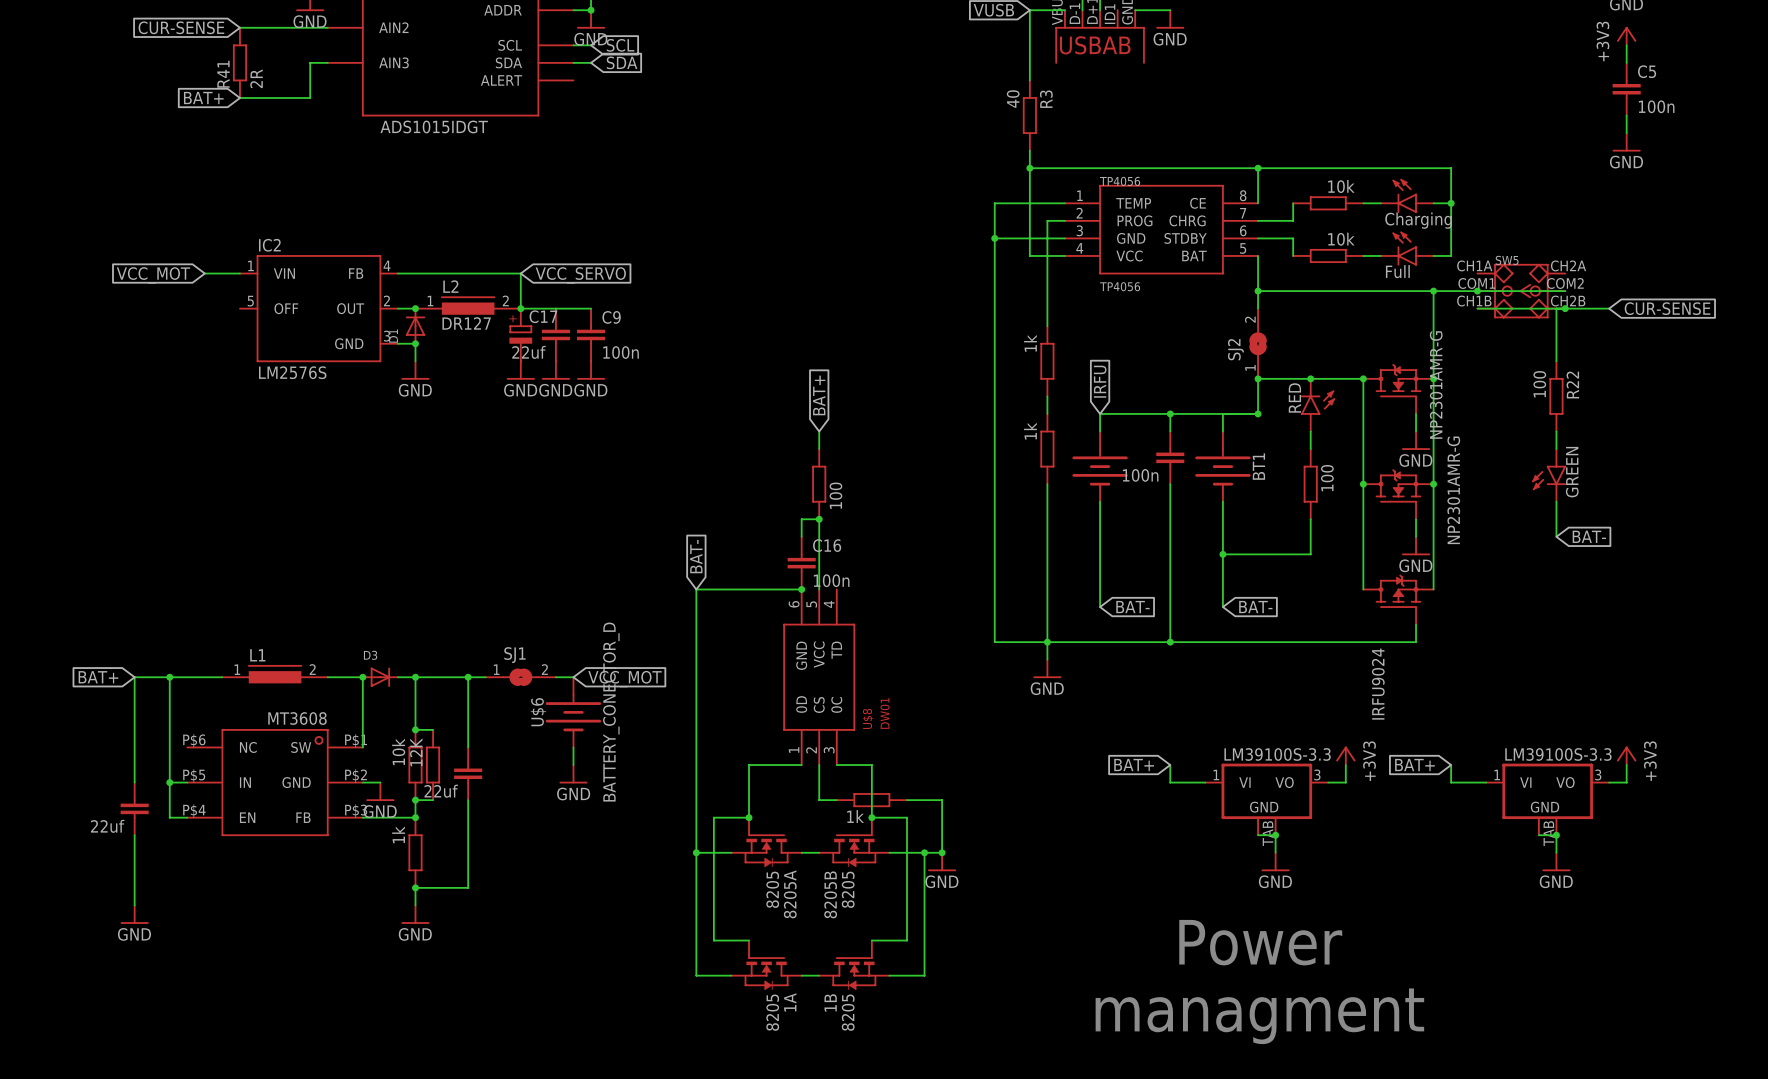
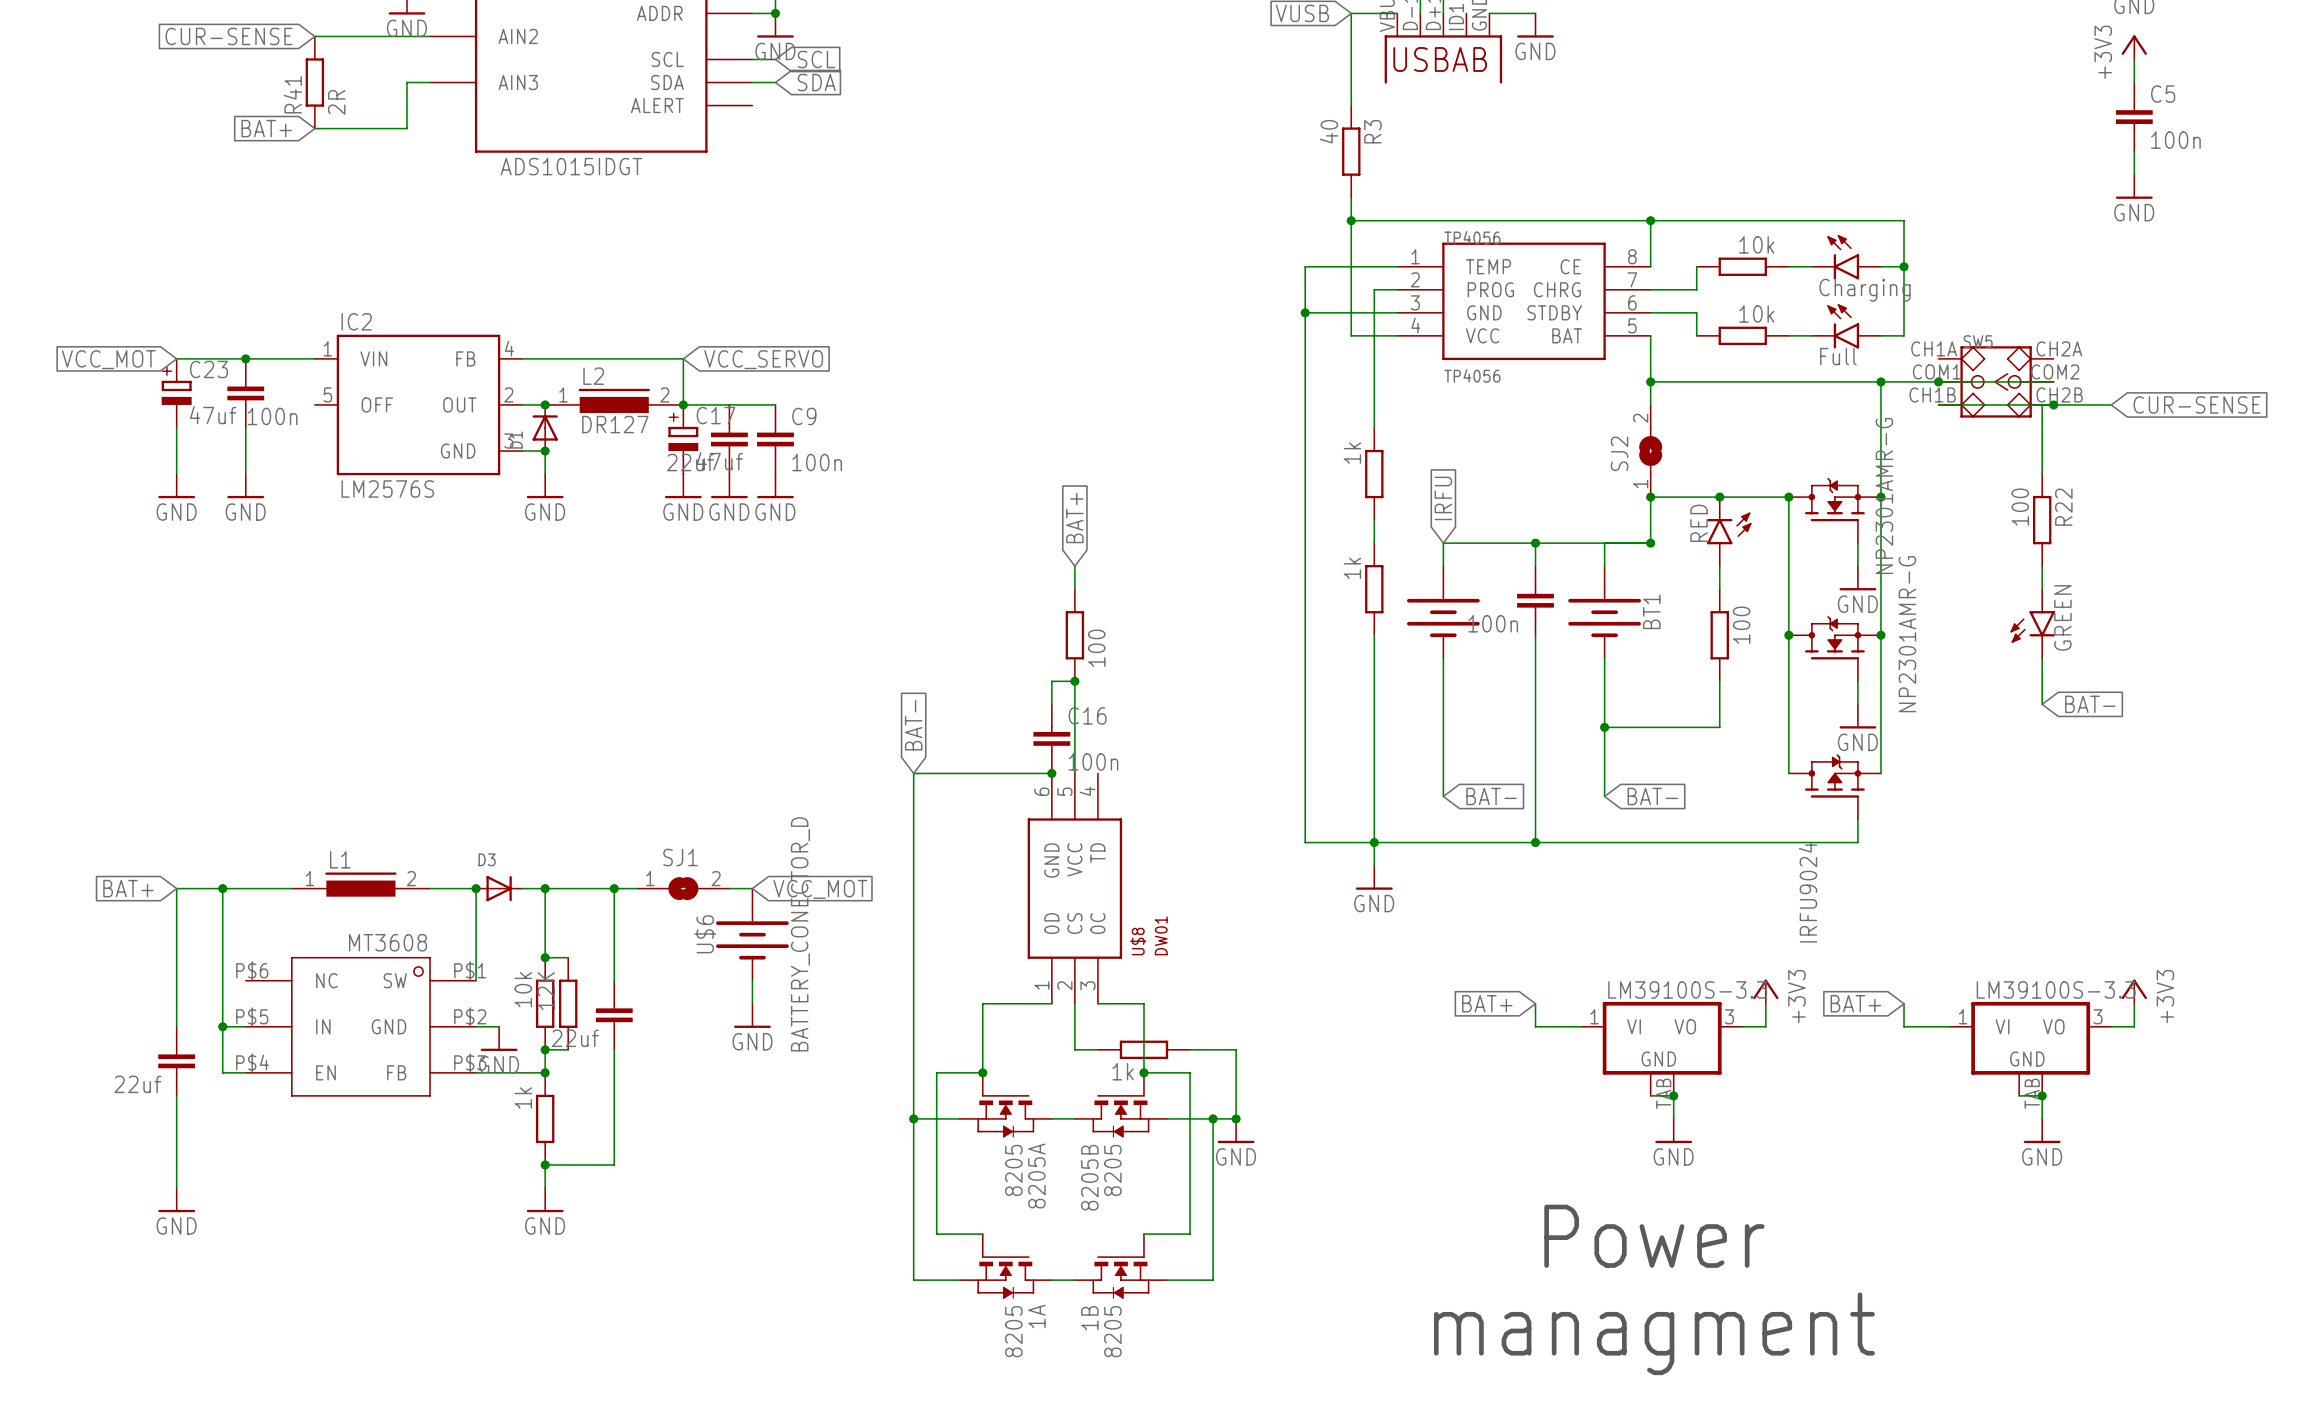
wire: none -> (176, 358) (268, 358)
junction: none -> (245, 358)
global label position: VCC_MOT (153, 275) -> VCC_MOT (108, 359)
C23: none -> 47uf (176, 393)
part: none -> 100n (245, 393)
wire: none -> (176, 427) (176, 474)
wire: none -> (245, 427) (245, 474)
C17 value: none -> 47uf (719, 461)
power symbol: none -> GND (176, 486)
power symbol: none -> GND (245, 486)

